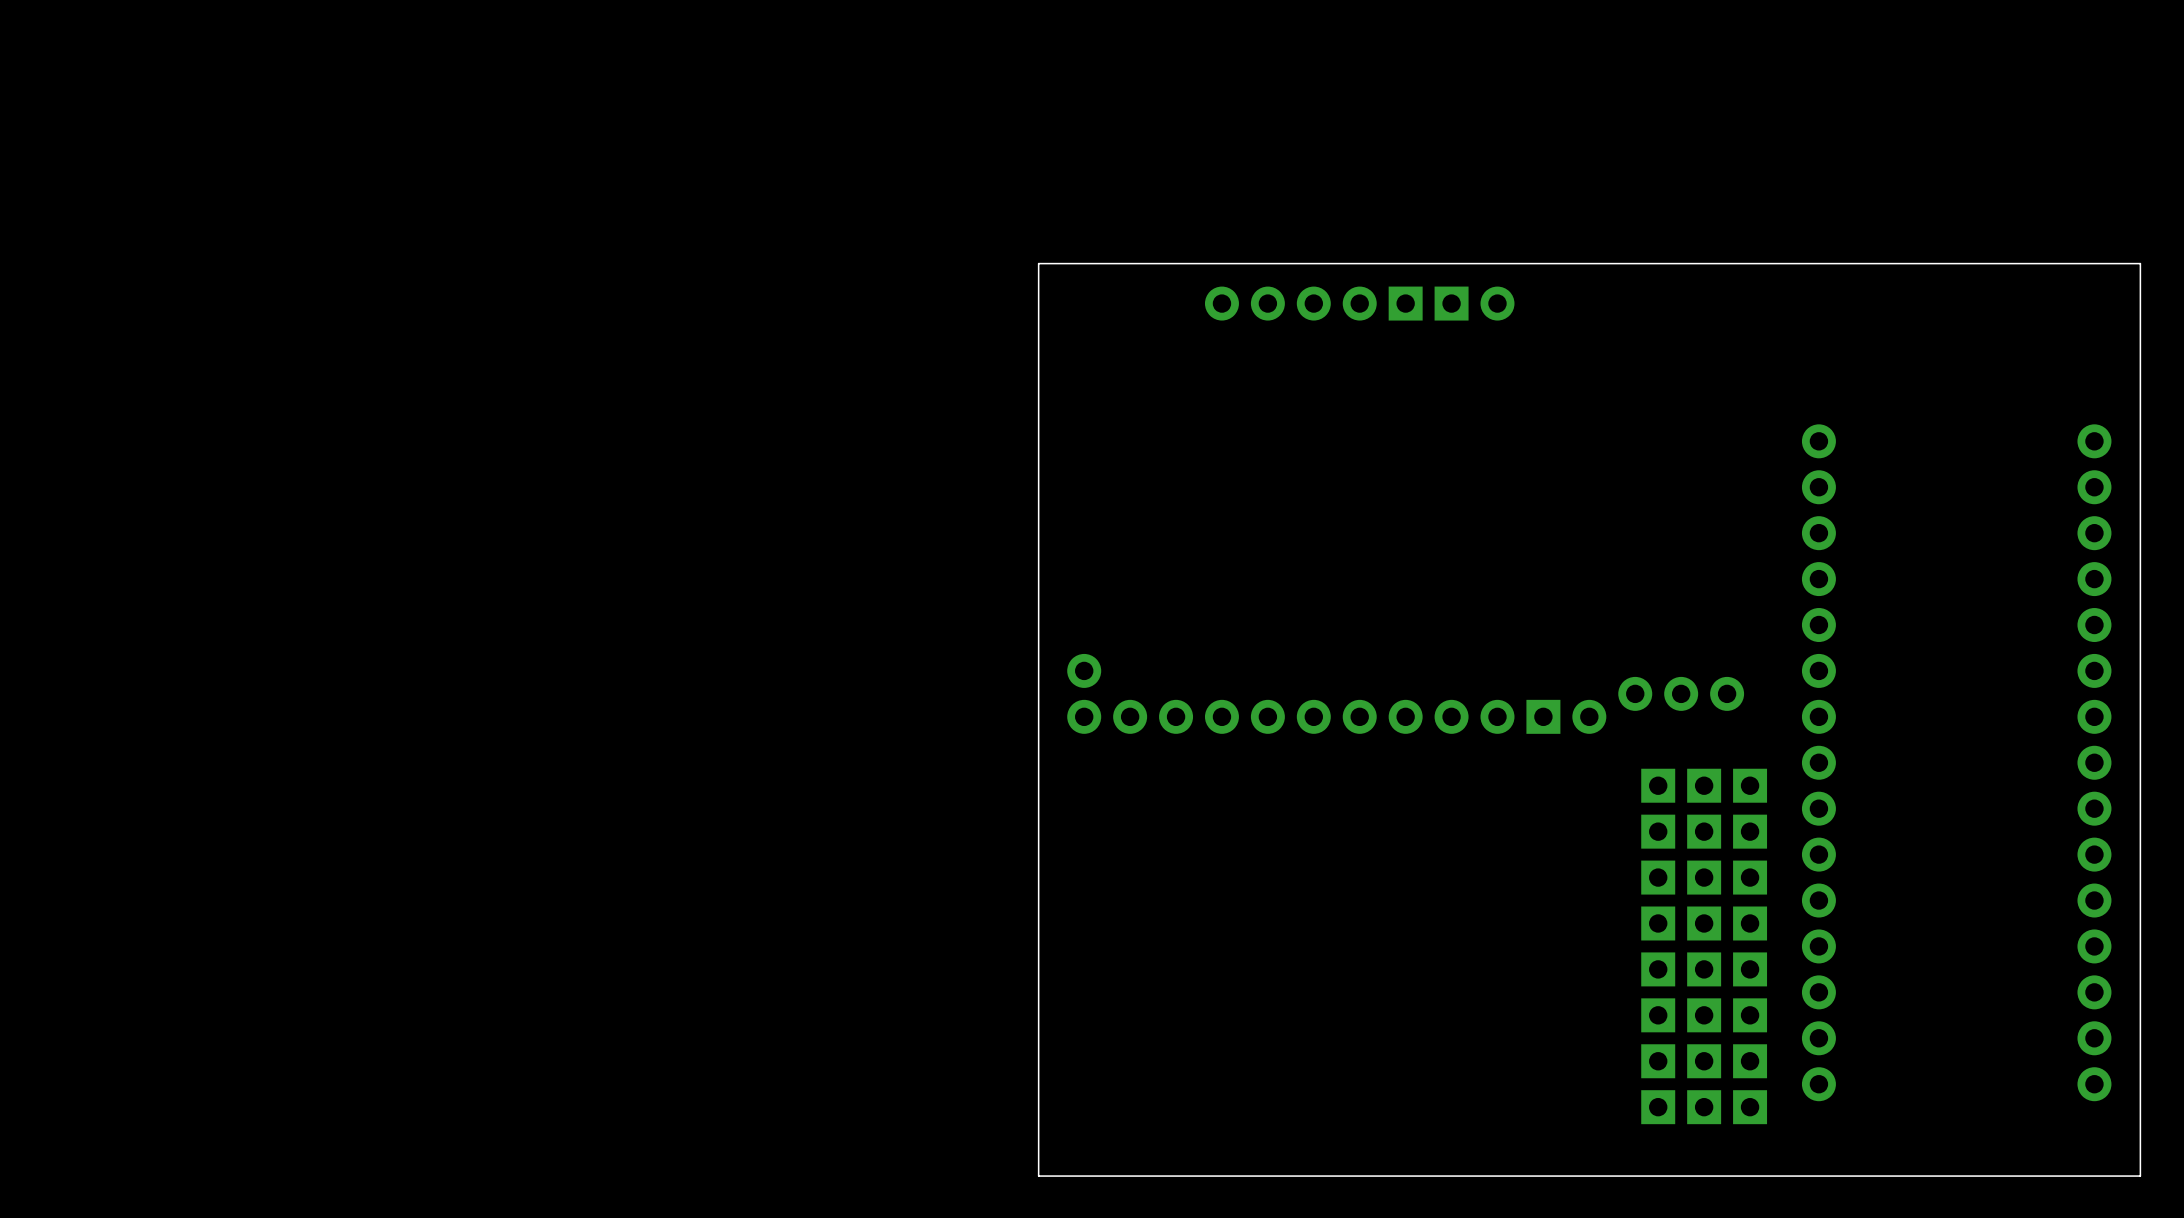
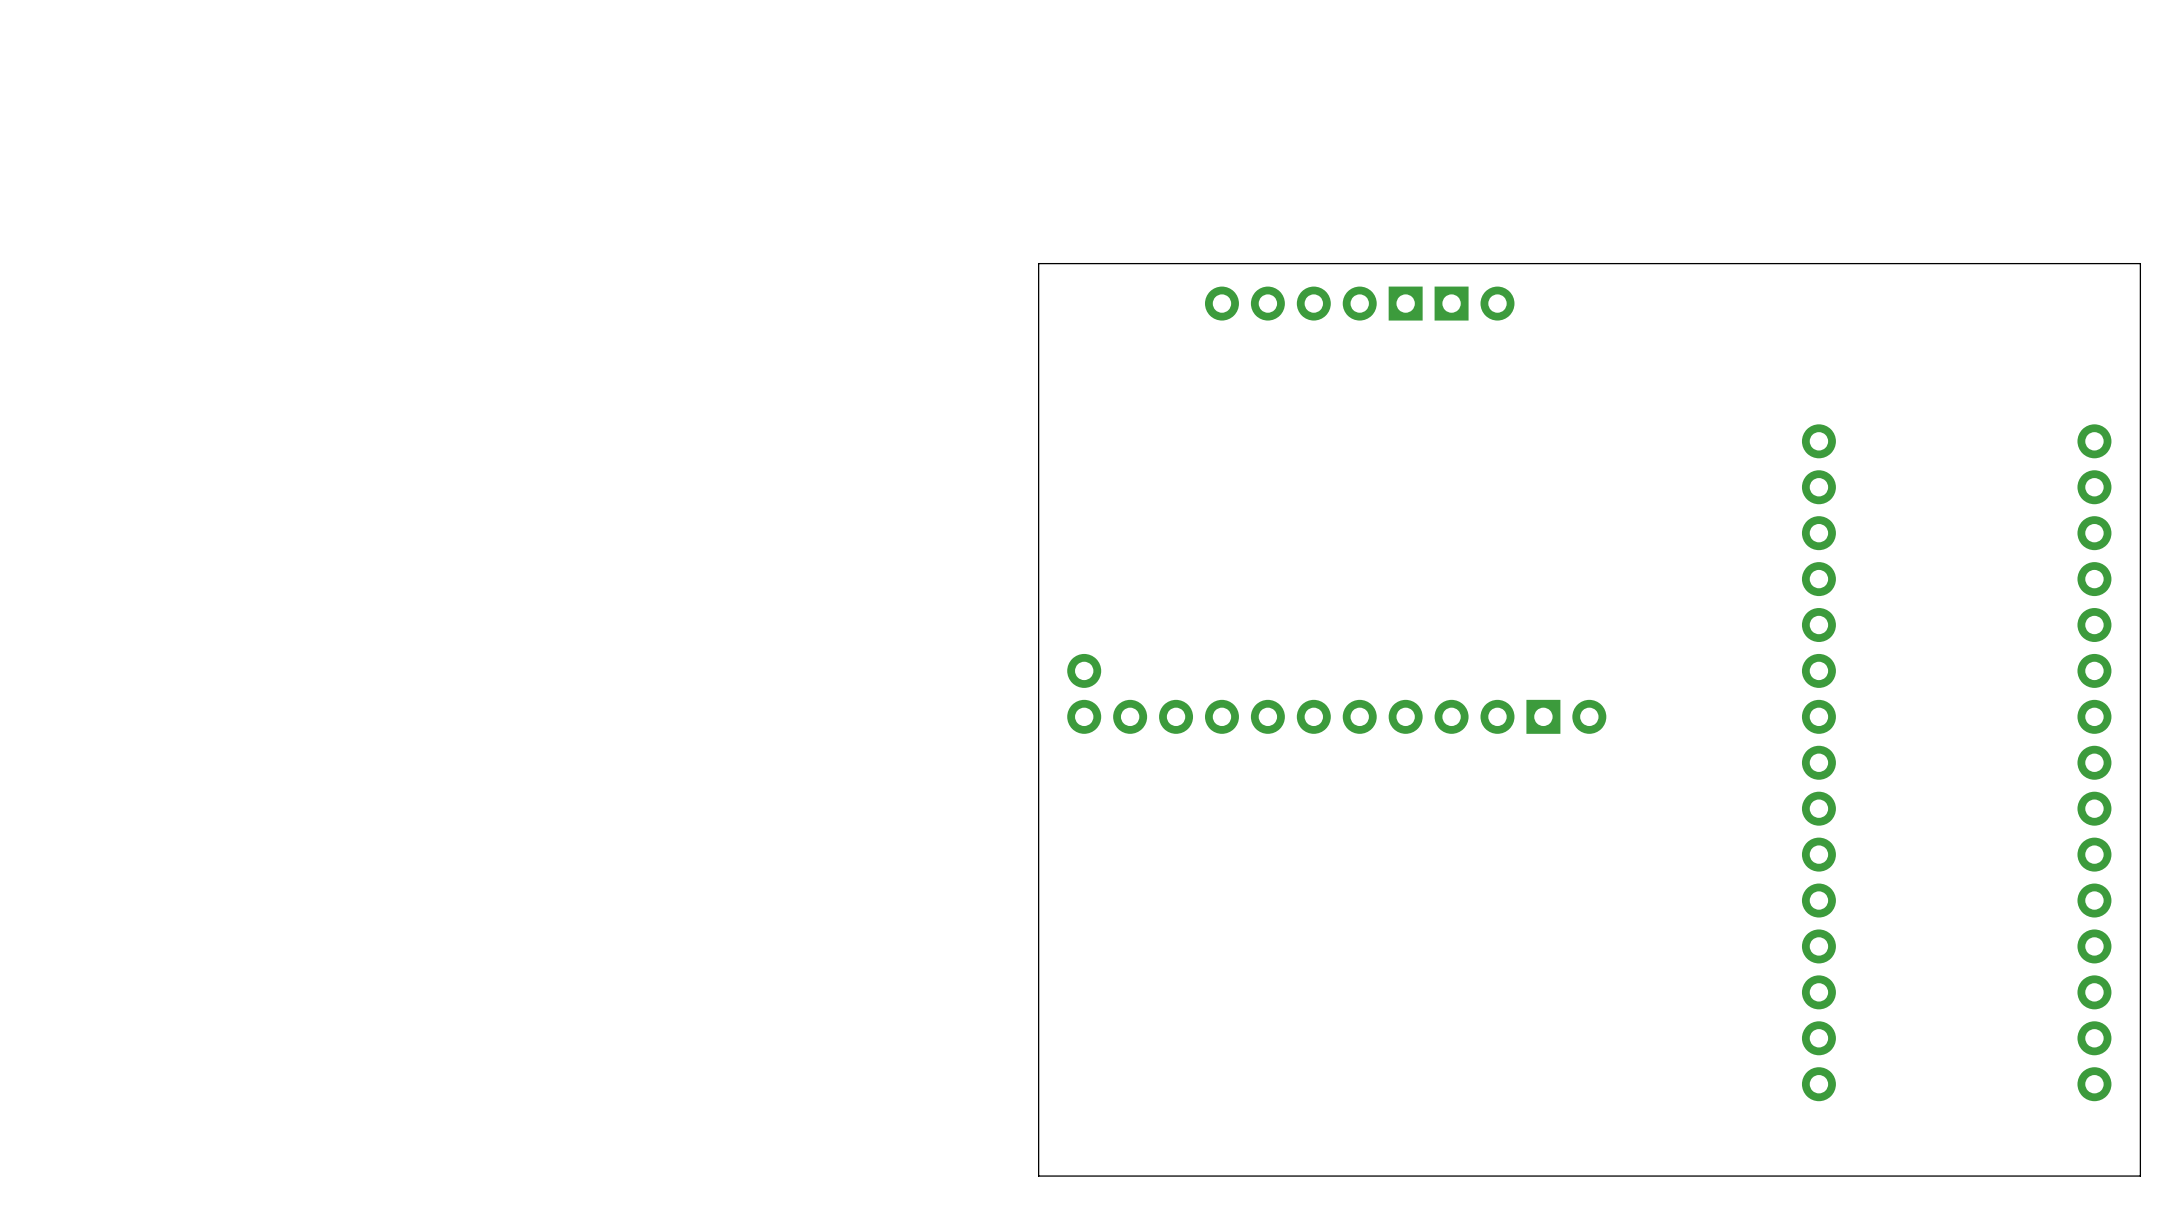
part: (1681, 693) -> none
part: (1704, 946) -> none

